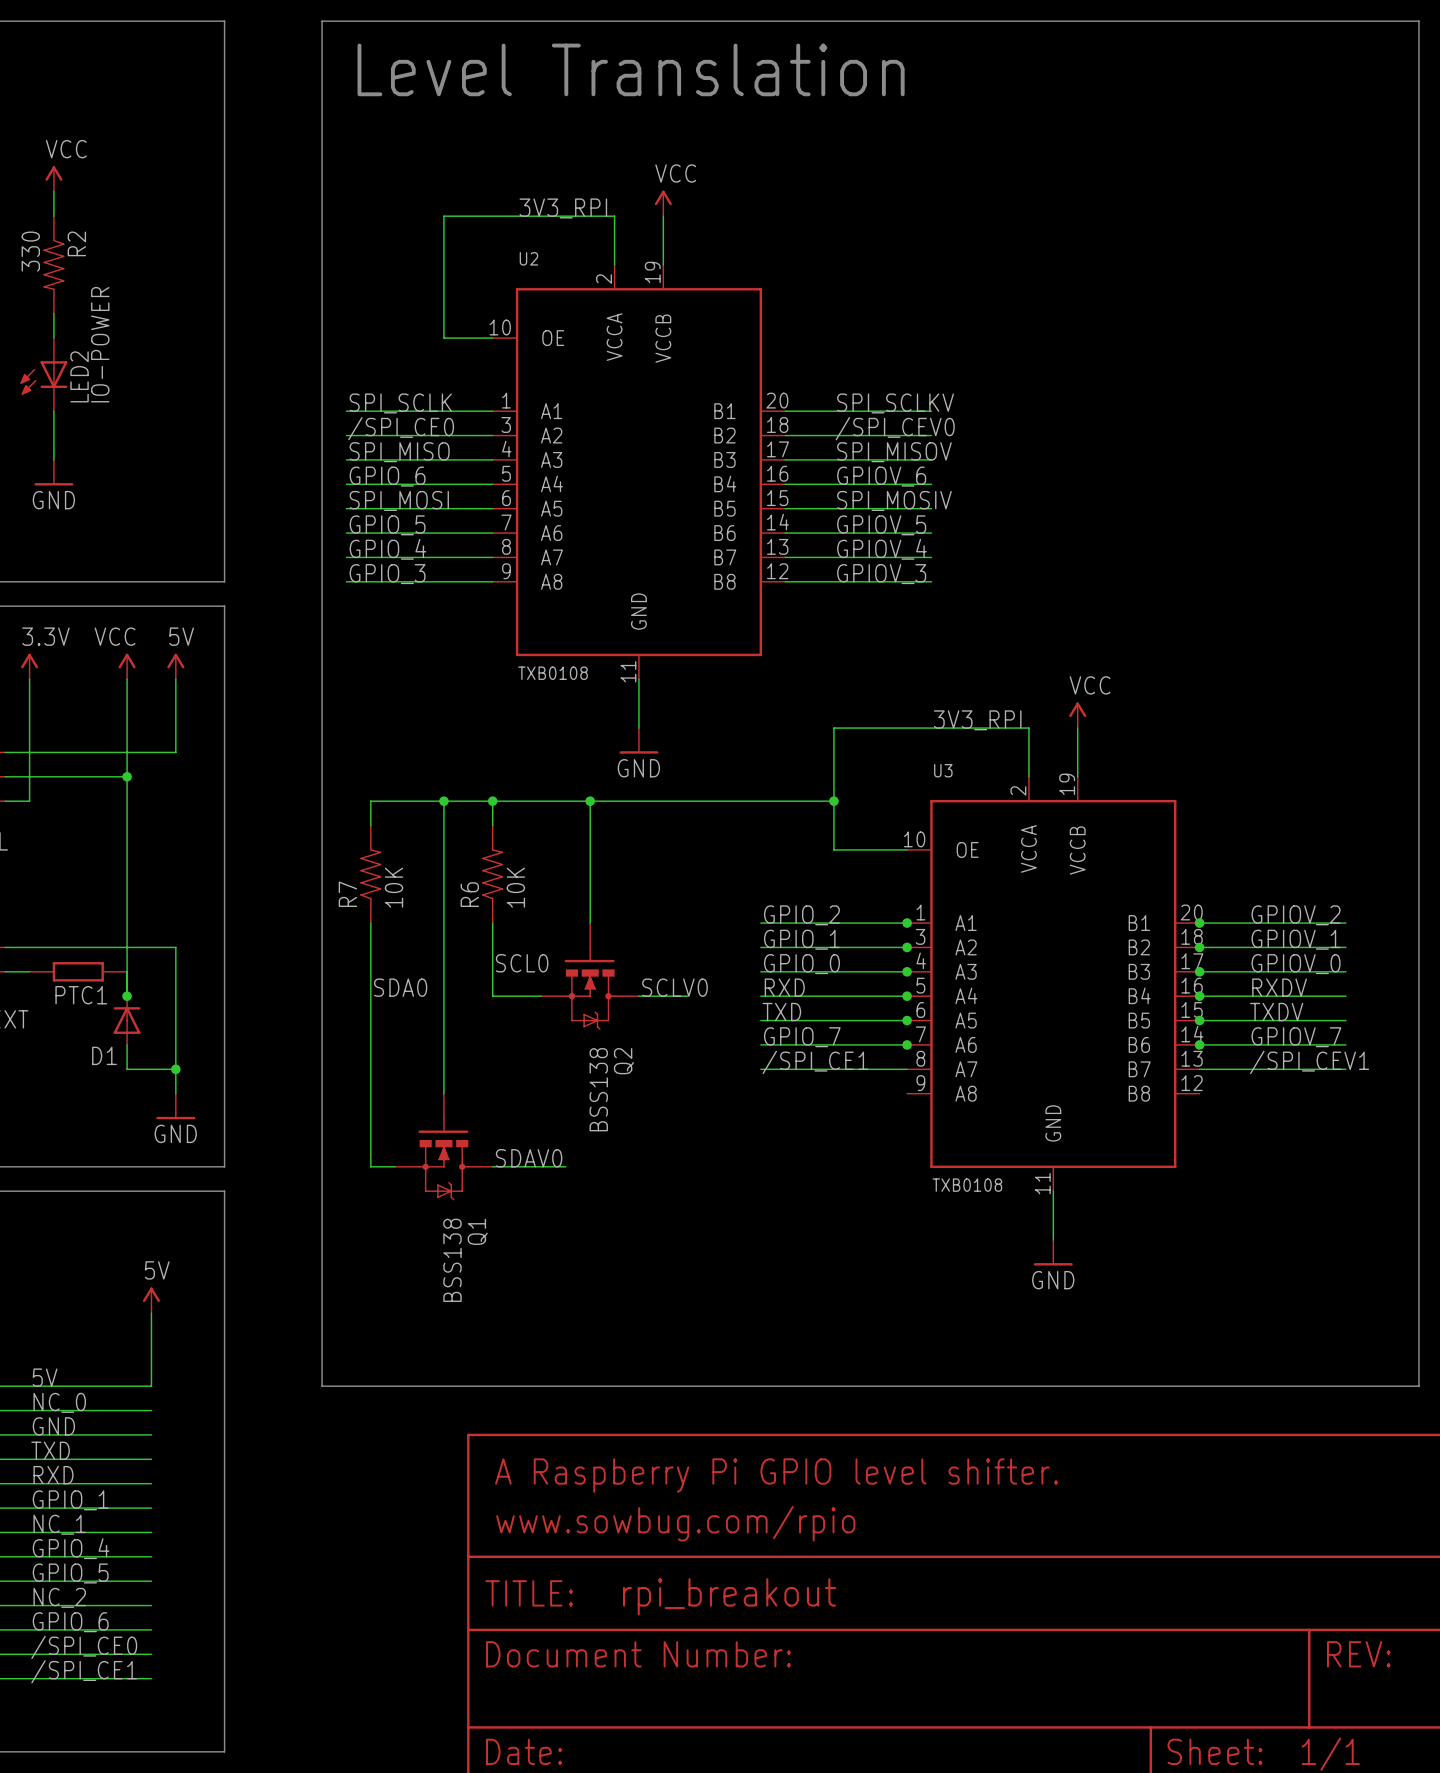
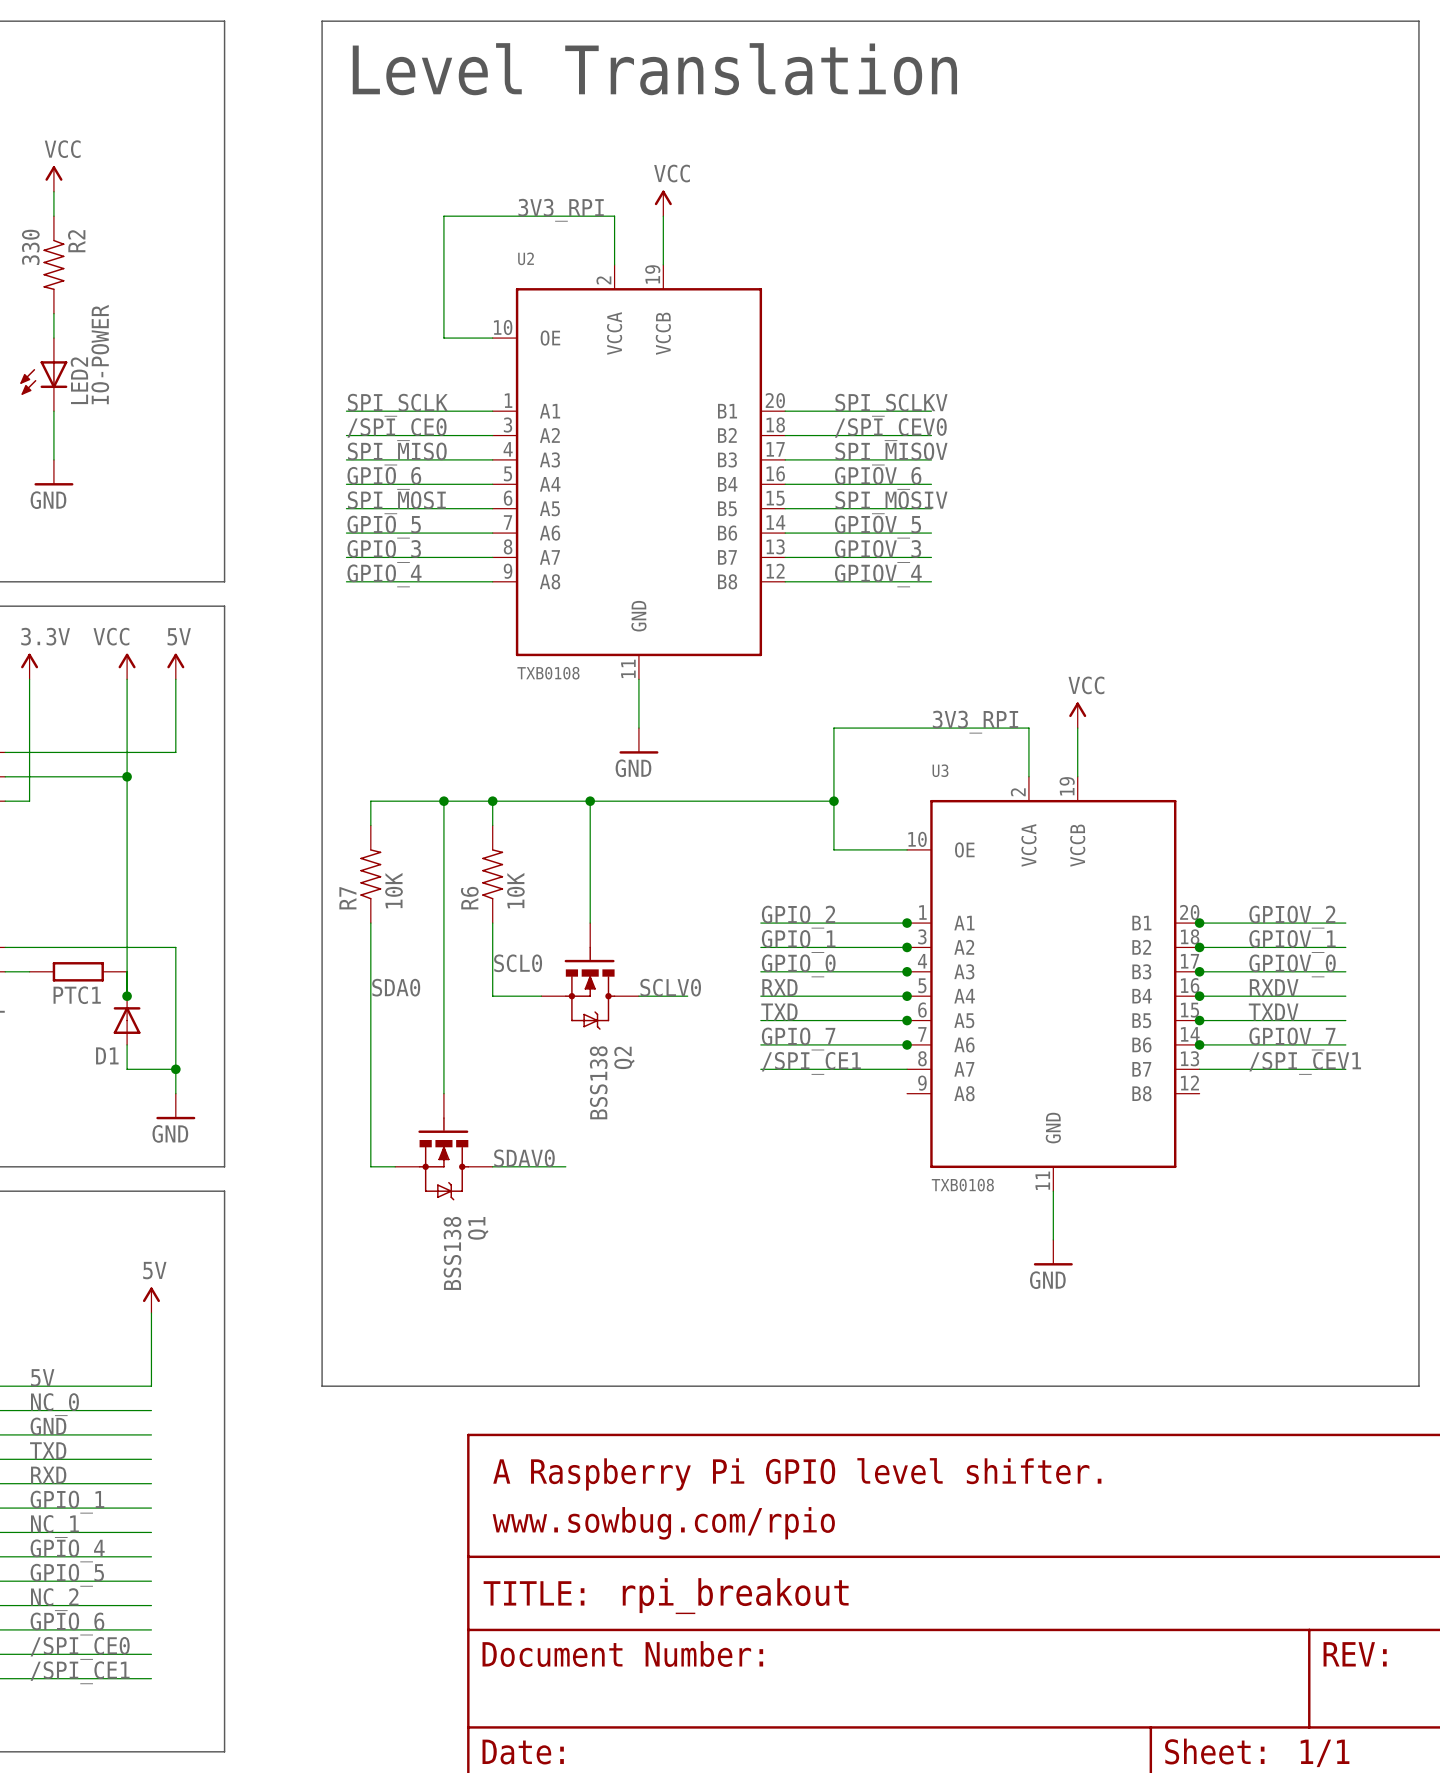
label: GPIO_4 (387, 549) -> GPIO_3 (384, 551)
label: GPIOV_4 (882, 549) -> GPIOV_3 (878, 551)
label: GPIO_3 (387, 574) -> GPIO_4 (384, 575)
label: GPIOV_3 (881, 574) -> GPIOV_4 (878, 575)

